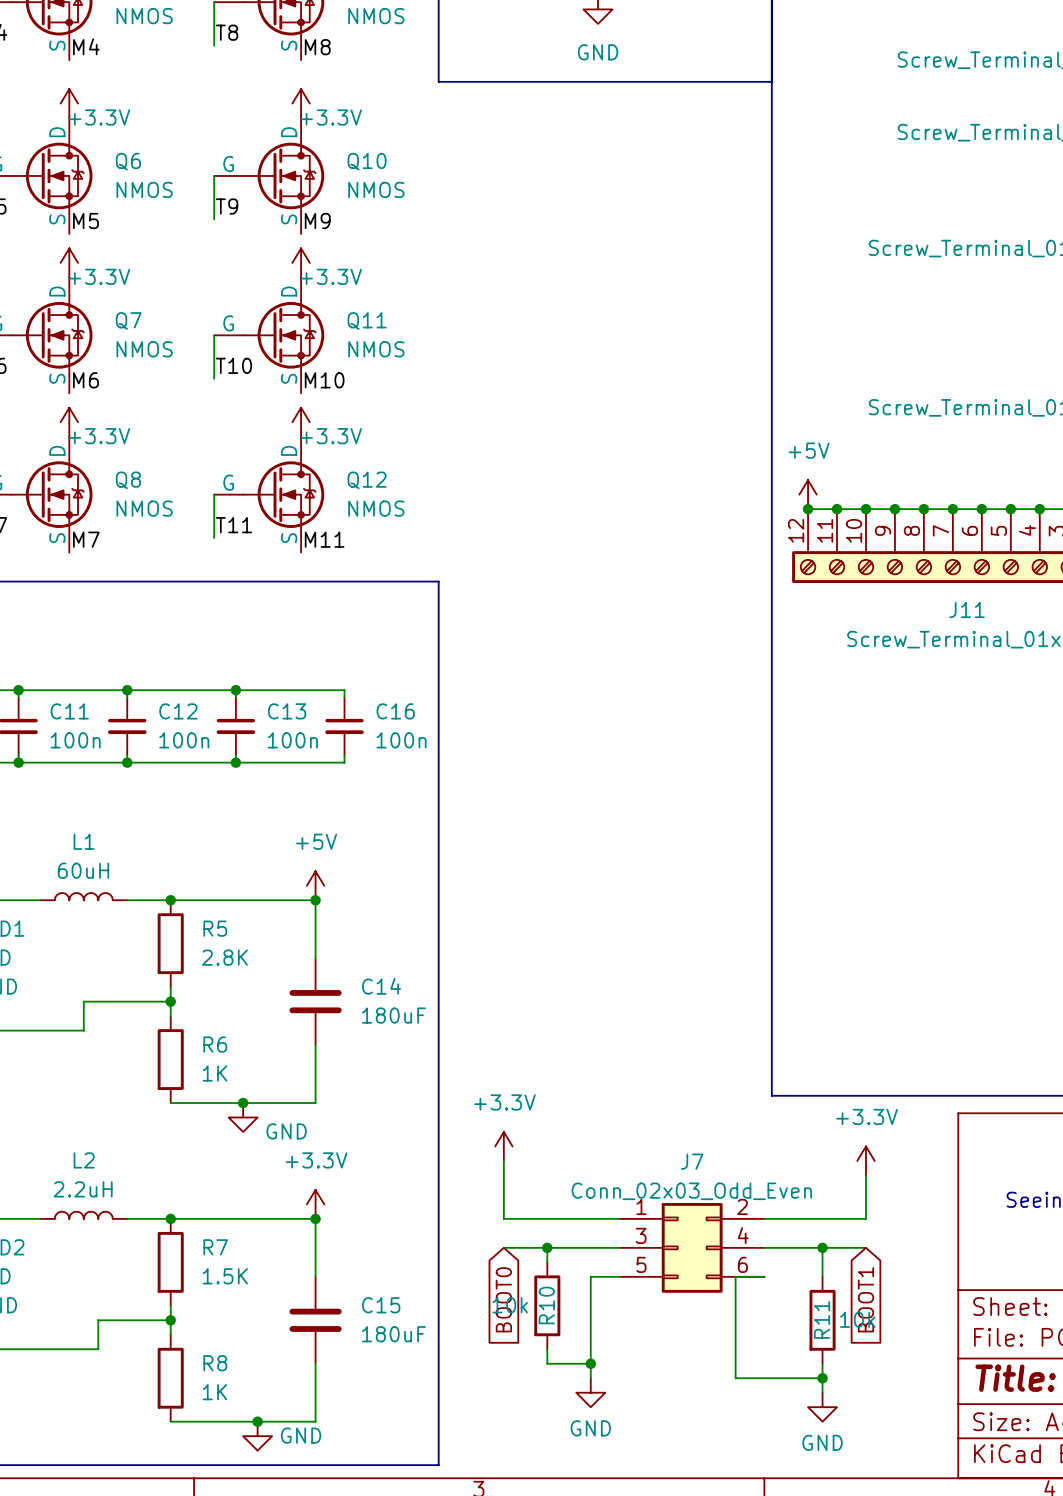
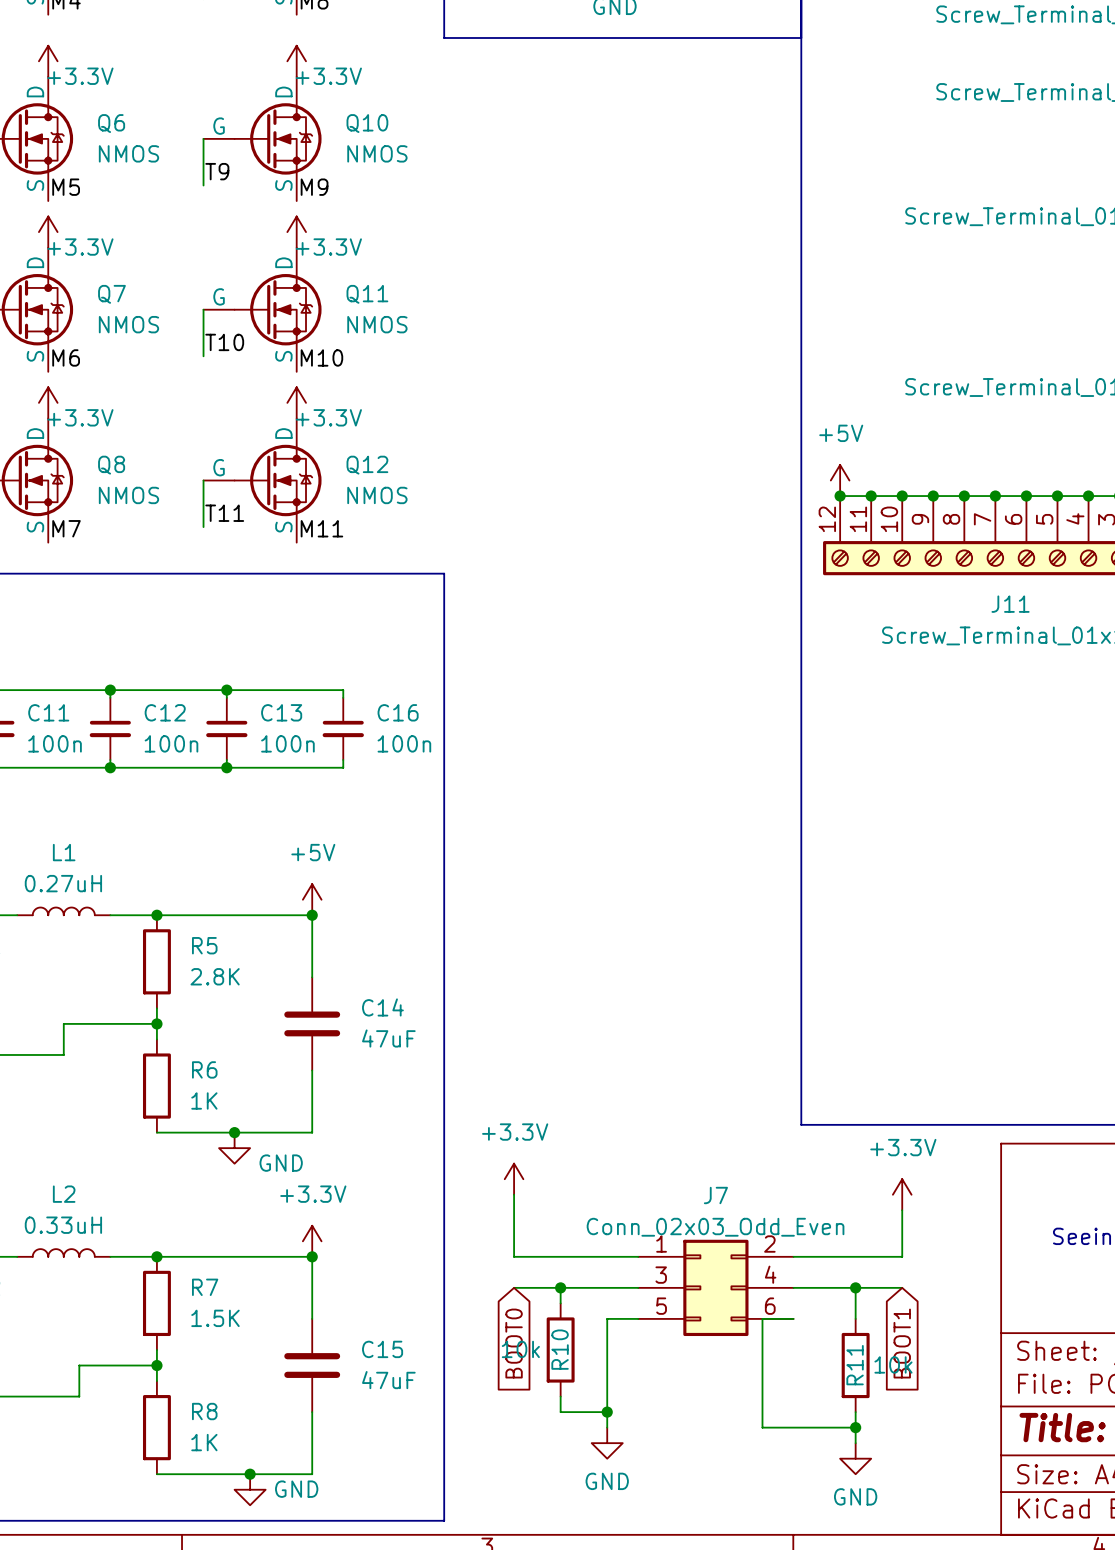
L1 value: 60uH (83, 870) -> 0.27uH (63, 883)
C14 value: 180uF (393, 1015) -> 47uF (388, 1038)
L2 value: 2.2uH (83, 1189) -> 0.33uH (63, 1225)
C15 value: 180uF (393, 1334) -> 47uF (388, 1380)

